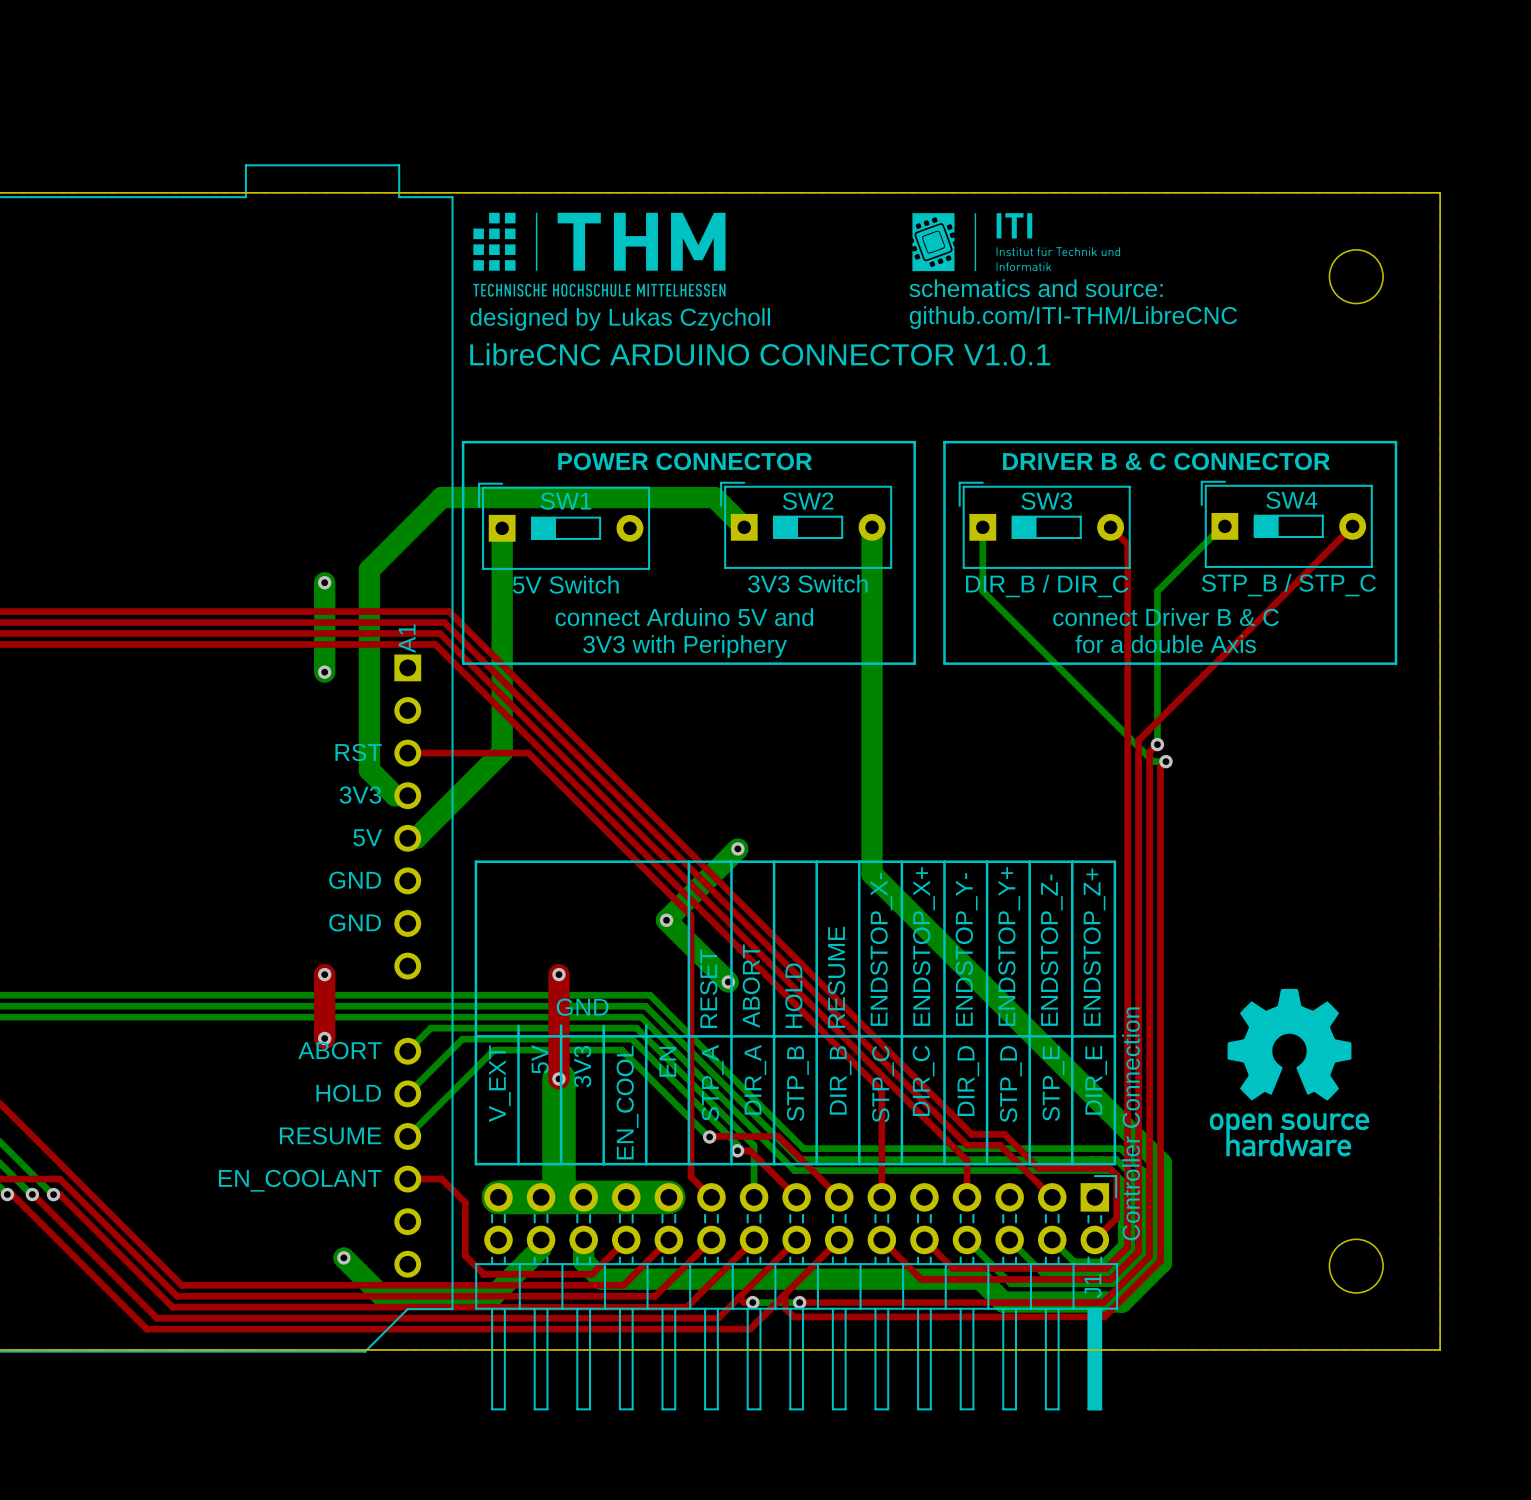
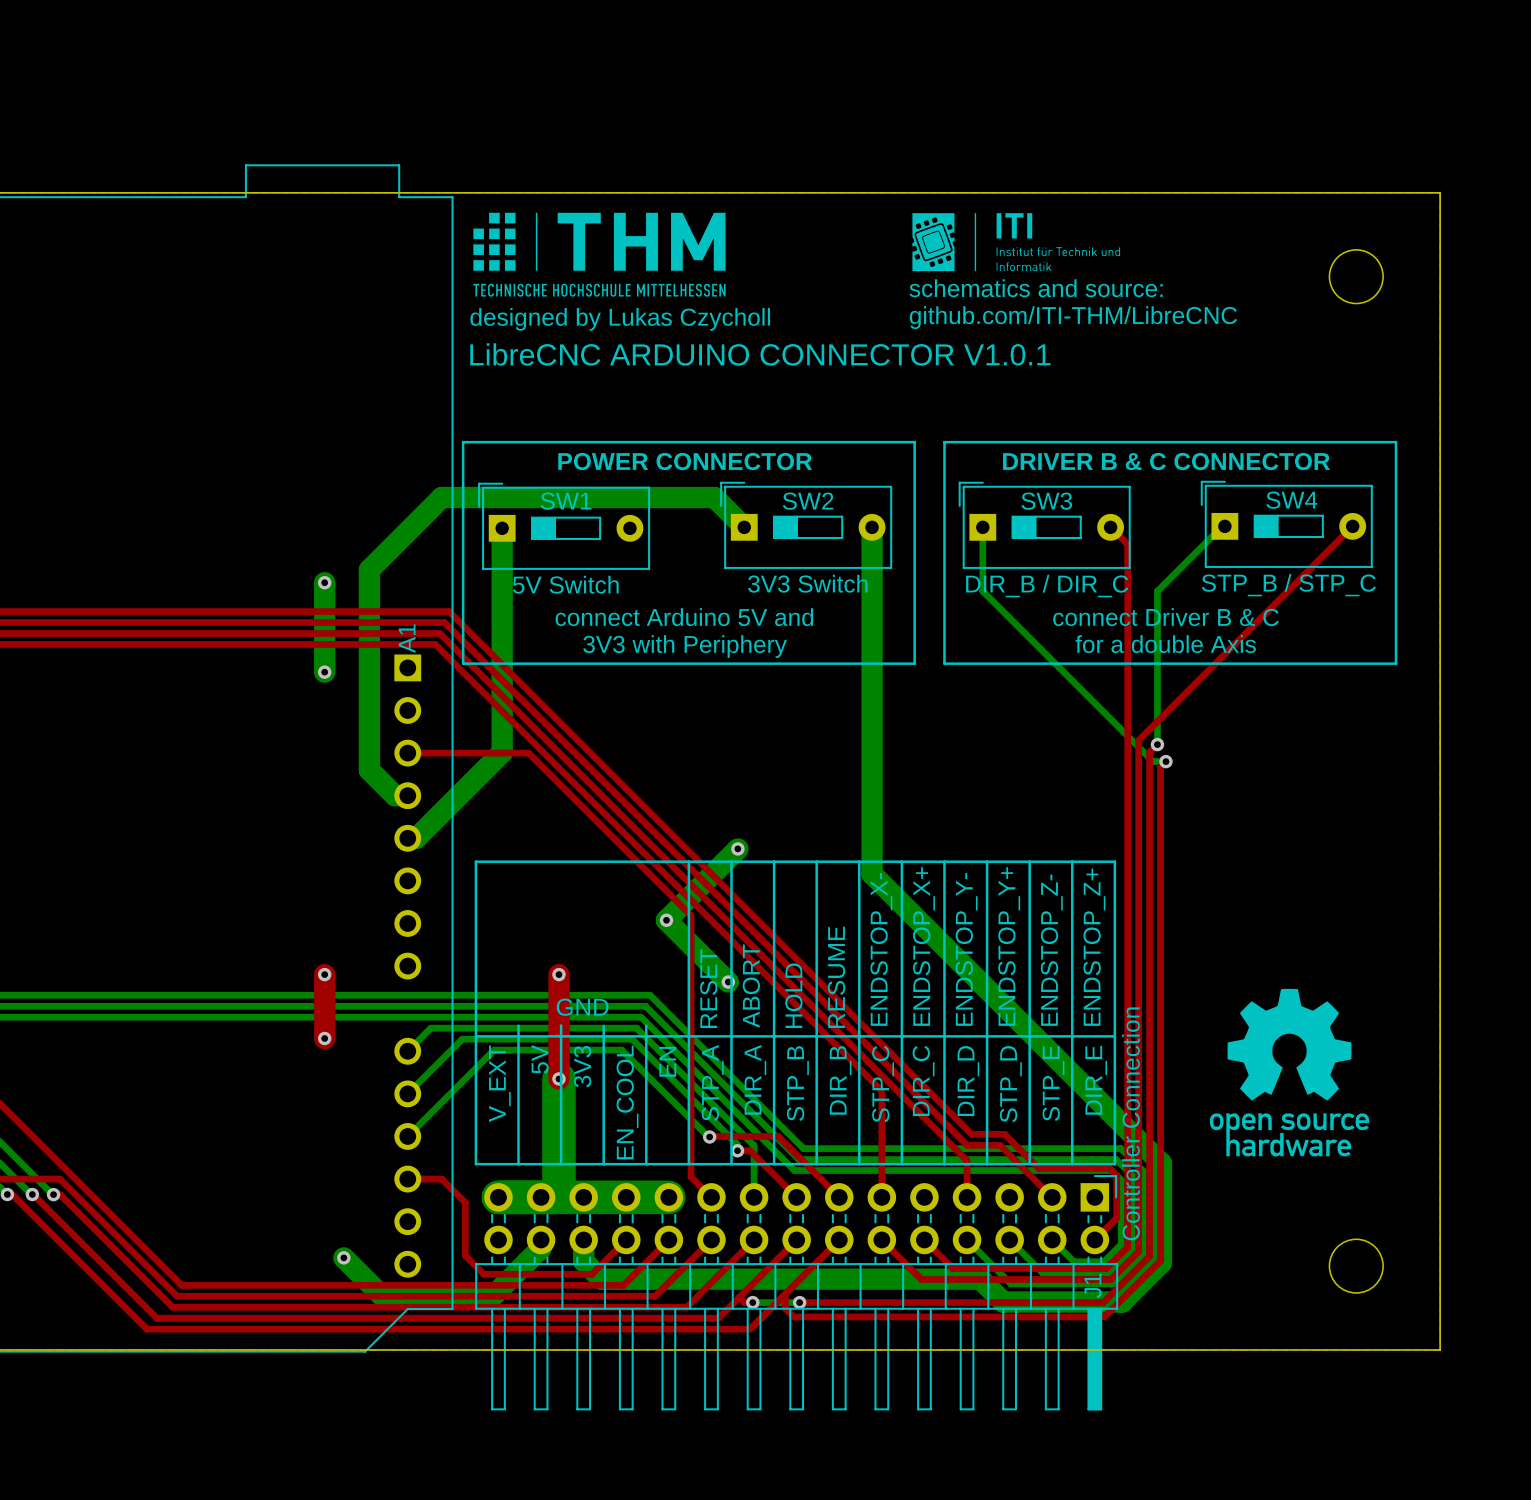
text: RST (358, 752) -> none
text: 3V3 (360, 795) -> none
text: 5V (367, 837) -> none
text: GND (355, 880) -> none
text: GND (355, 922) -> none
text: ABORT (339, 1050) -> none
text: HOLD (348, 1093) -> none
text: RESUME (330, 1135) -> none
text: EN_COOLANT (300, 1180) -> none

